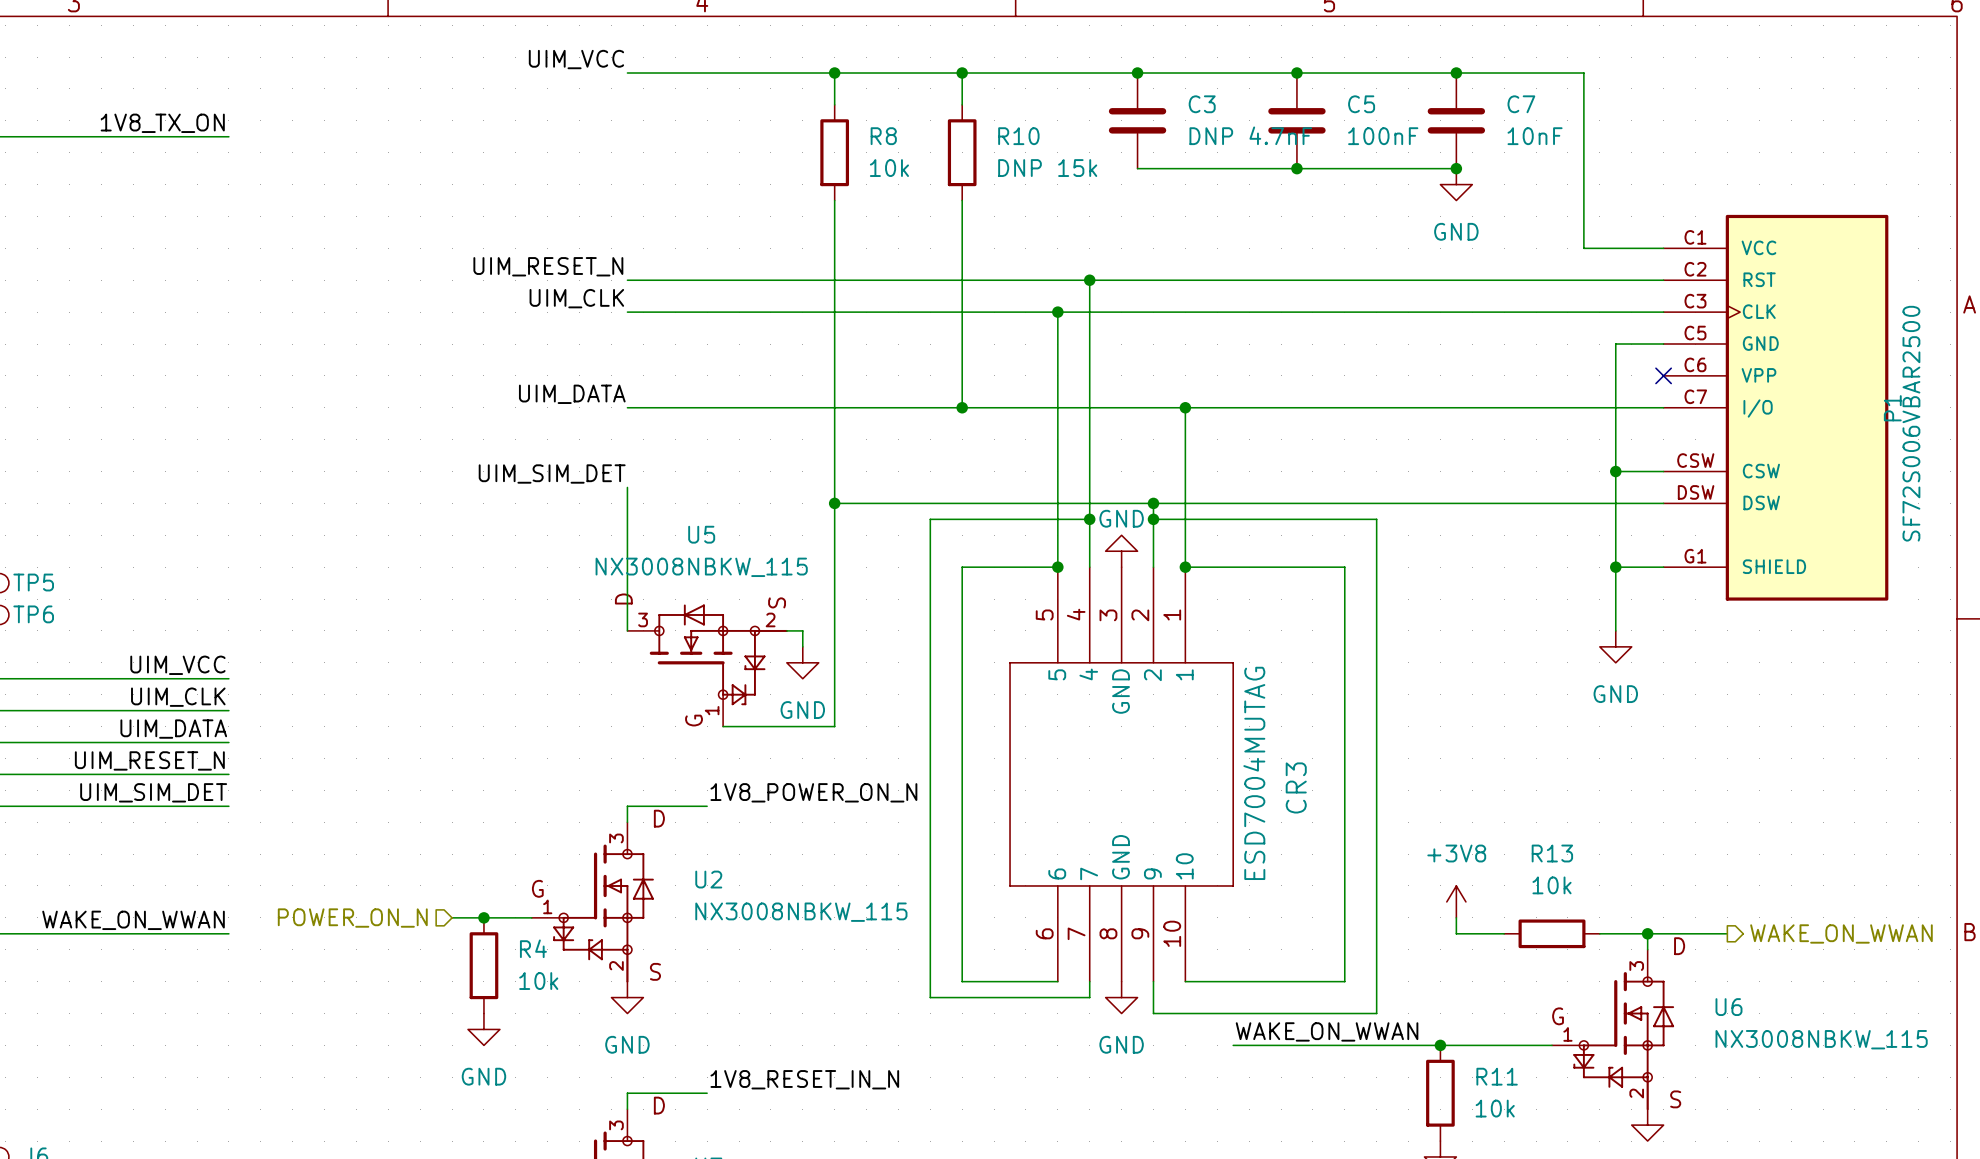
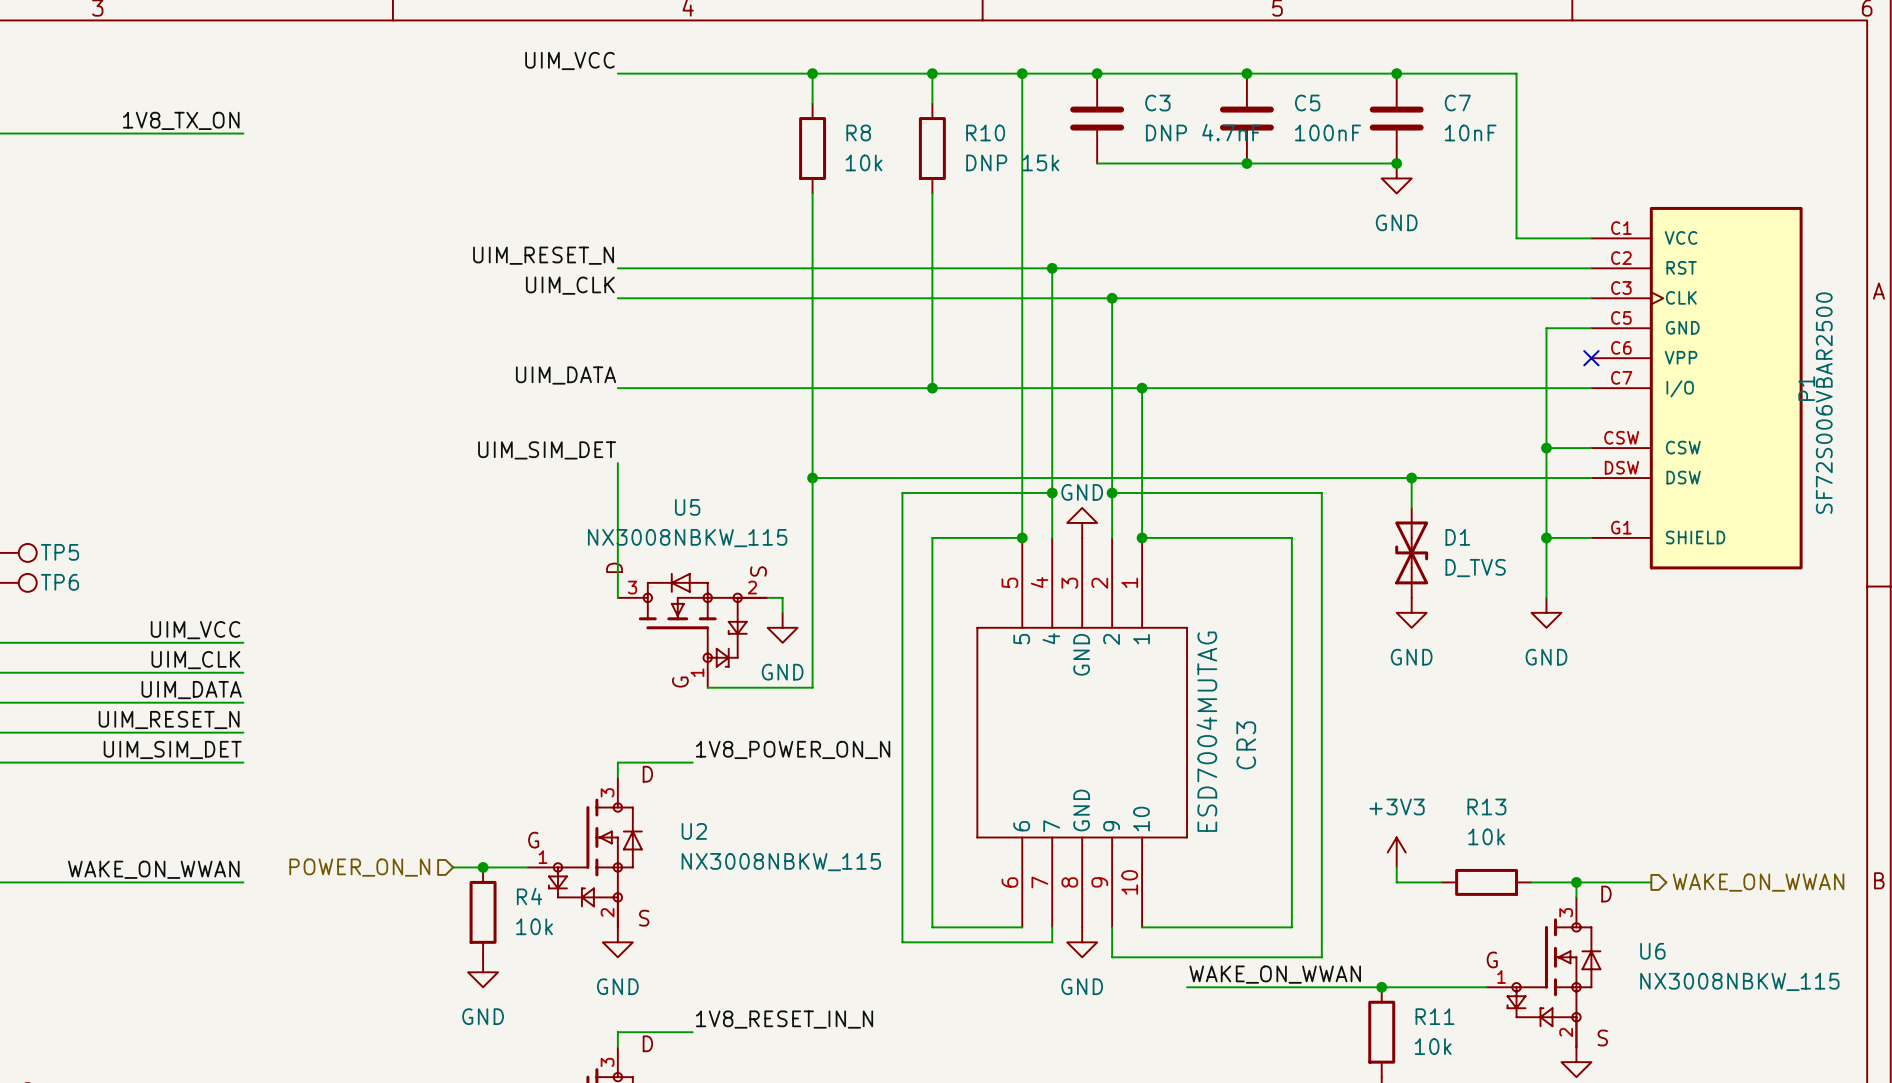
wire: none -> (1022, 73) (1022, 298)
junction: none -> (1022, 73)
junction: (1057, 312) -> none
wire: none -> (1112, 298) (1112, 478)
junction: none -> (1112, 298)
junction: (1153, 503) -> none
wire: none -> (1411, 478) (1411, 507)
junction: none -> (1411, 478)
D1: none -> D_TVS (1411, 552)
power symbol: none -> GND (1411, 612)
power symbol: +3V8 (1456, 901) -> +3V3 (1396, 852)

